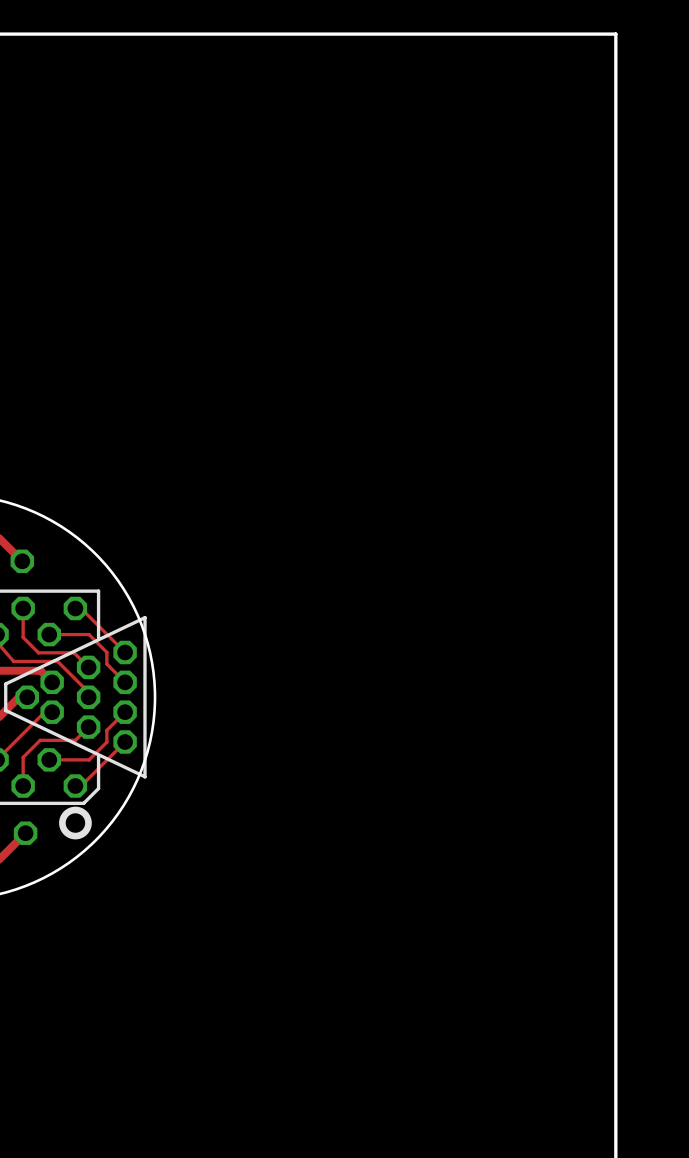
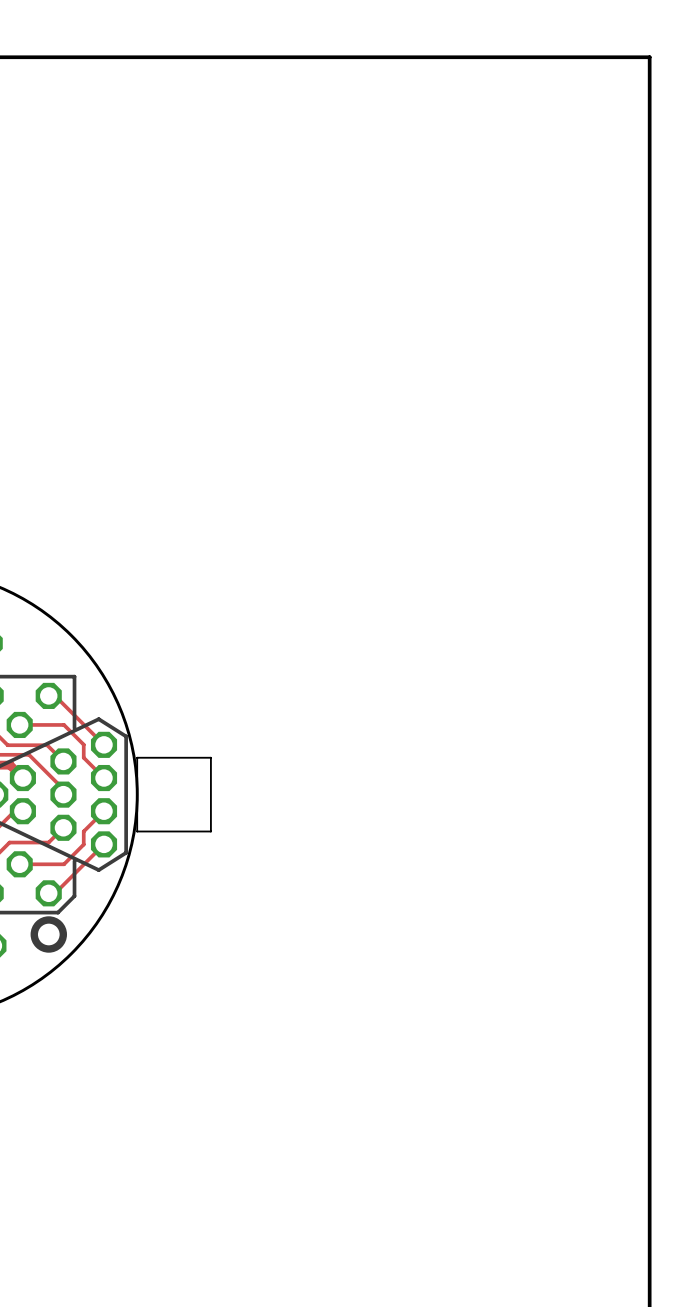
line: (120, 629) (144, 617) (144, 644) -> (98, 719) (126, 736)
board edge: none -> (210, 757) (137, 757) (137, 831) (210, 831) (210, 757)
line: (144, 749) (144, 776) (120, 765) -> (126, 852) (98, 870)

